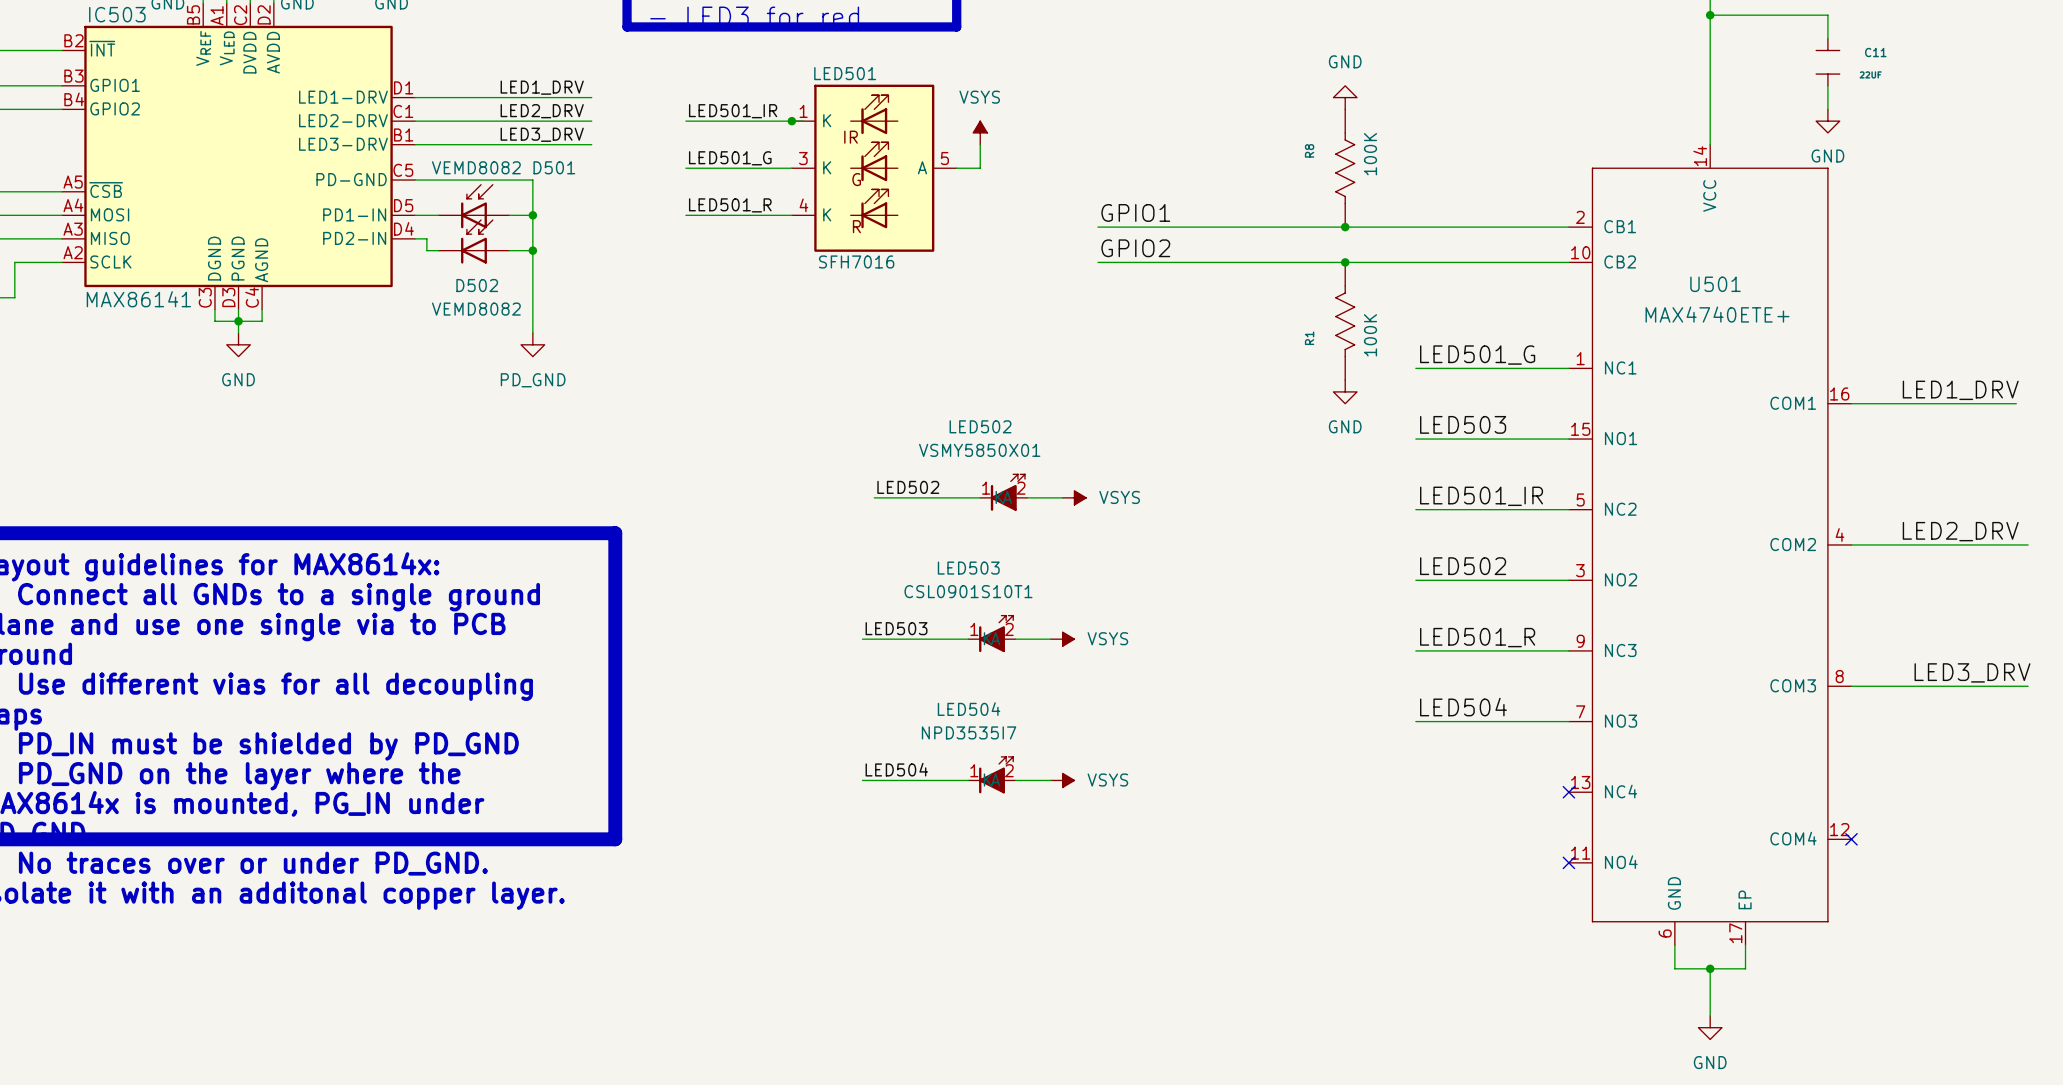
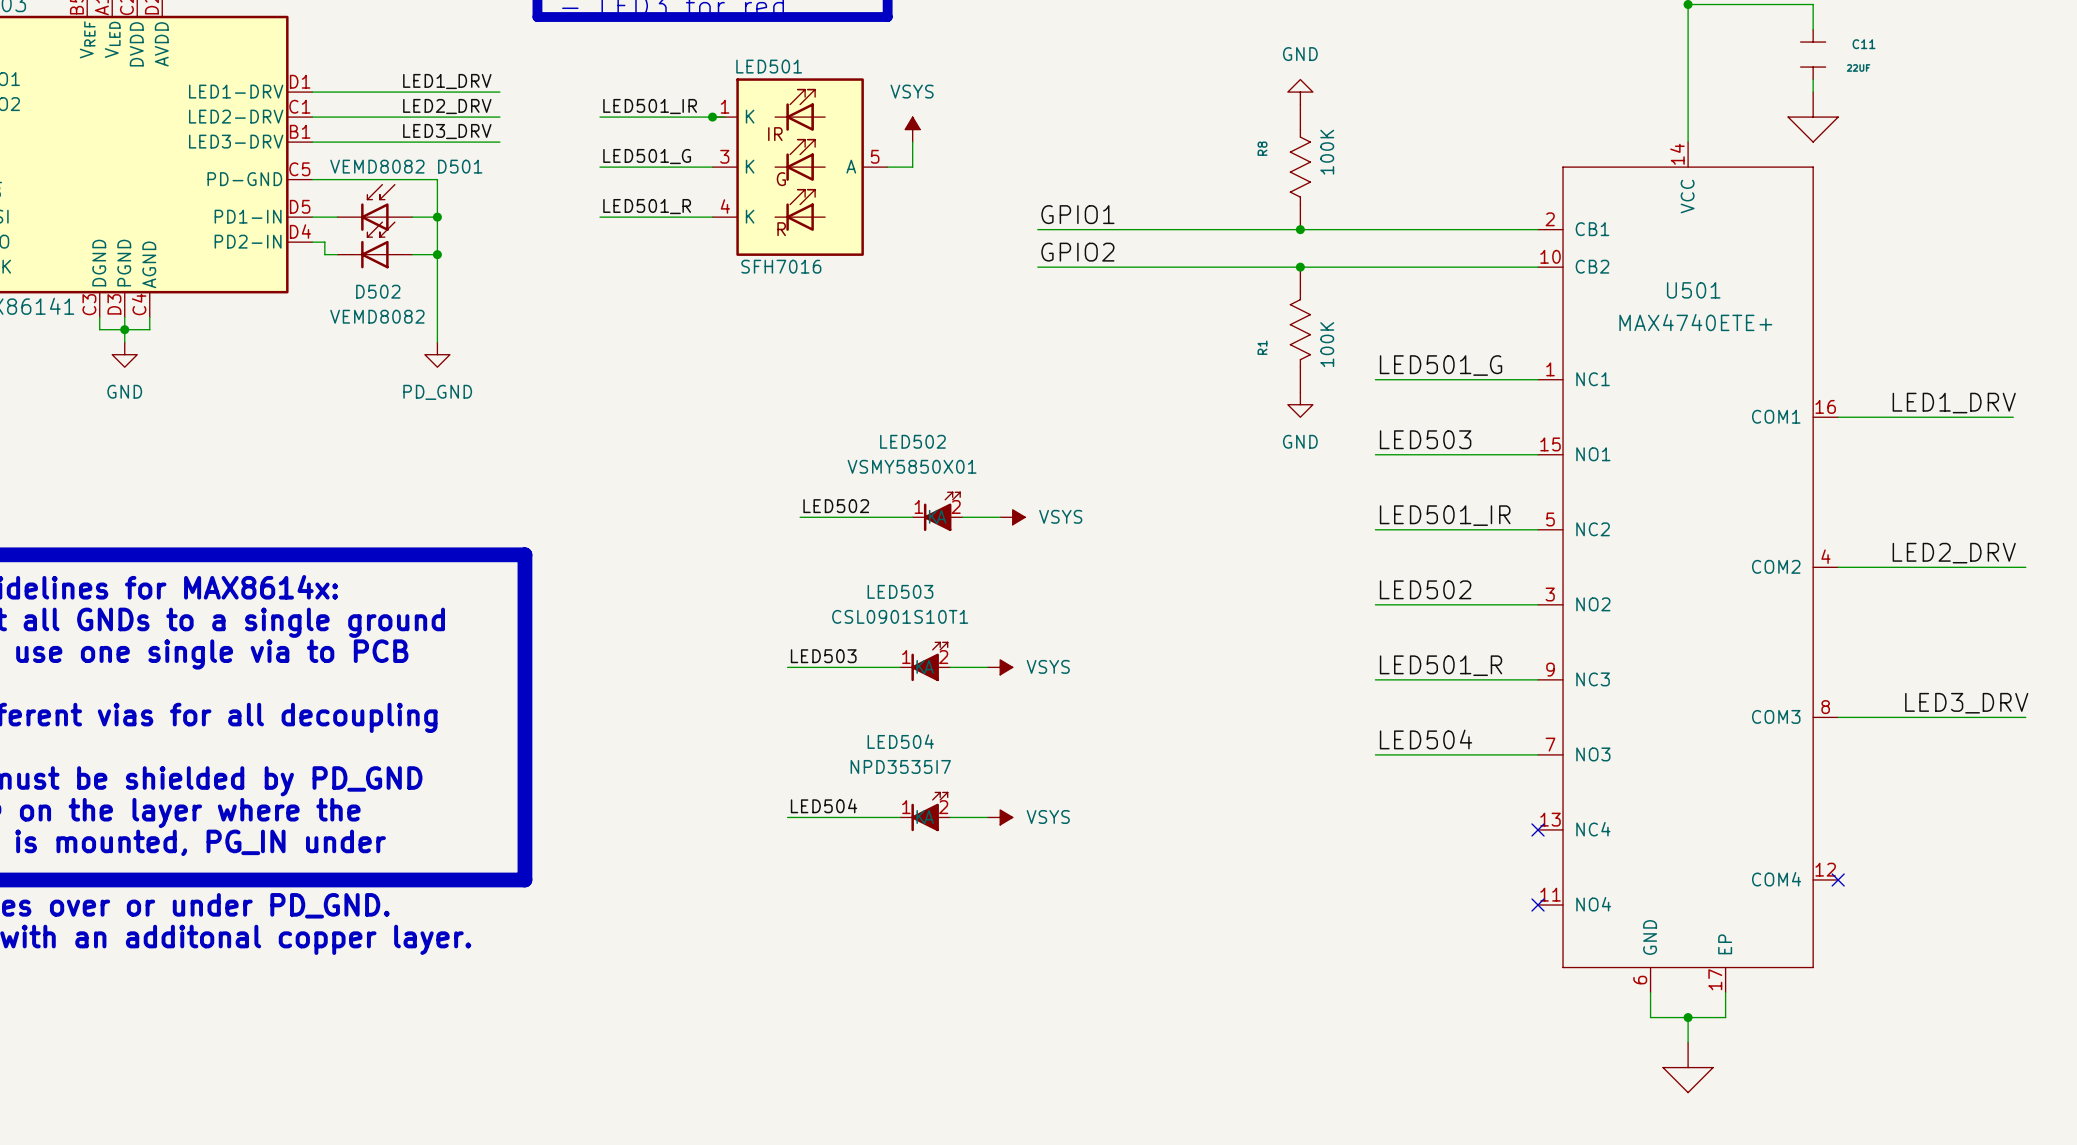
power symbol shape: [1816, 109, 1840, 133] -> [1788, 92, 1839, 143]
power symbol text: GND (1827, 156) -> none
power symbol: none -> (1688, 1067)
power symbol: GND (1710, 1027) -> none

